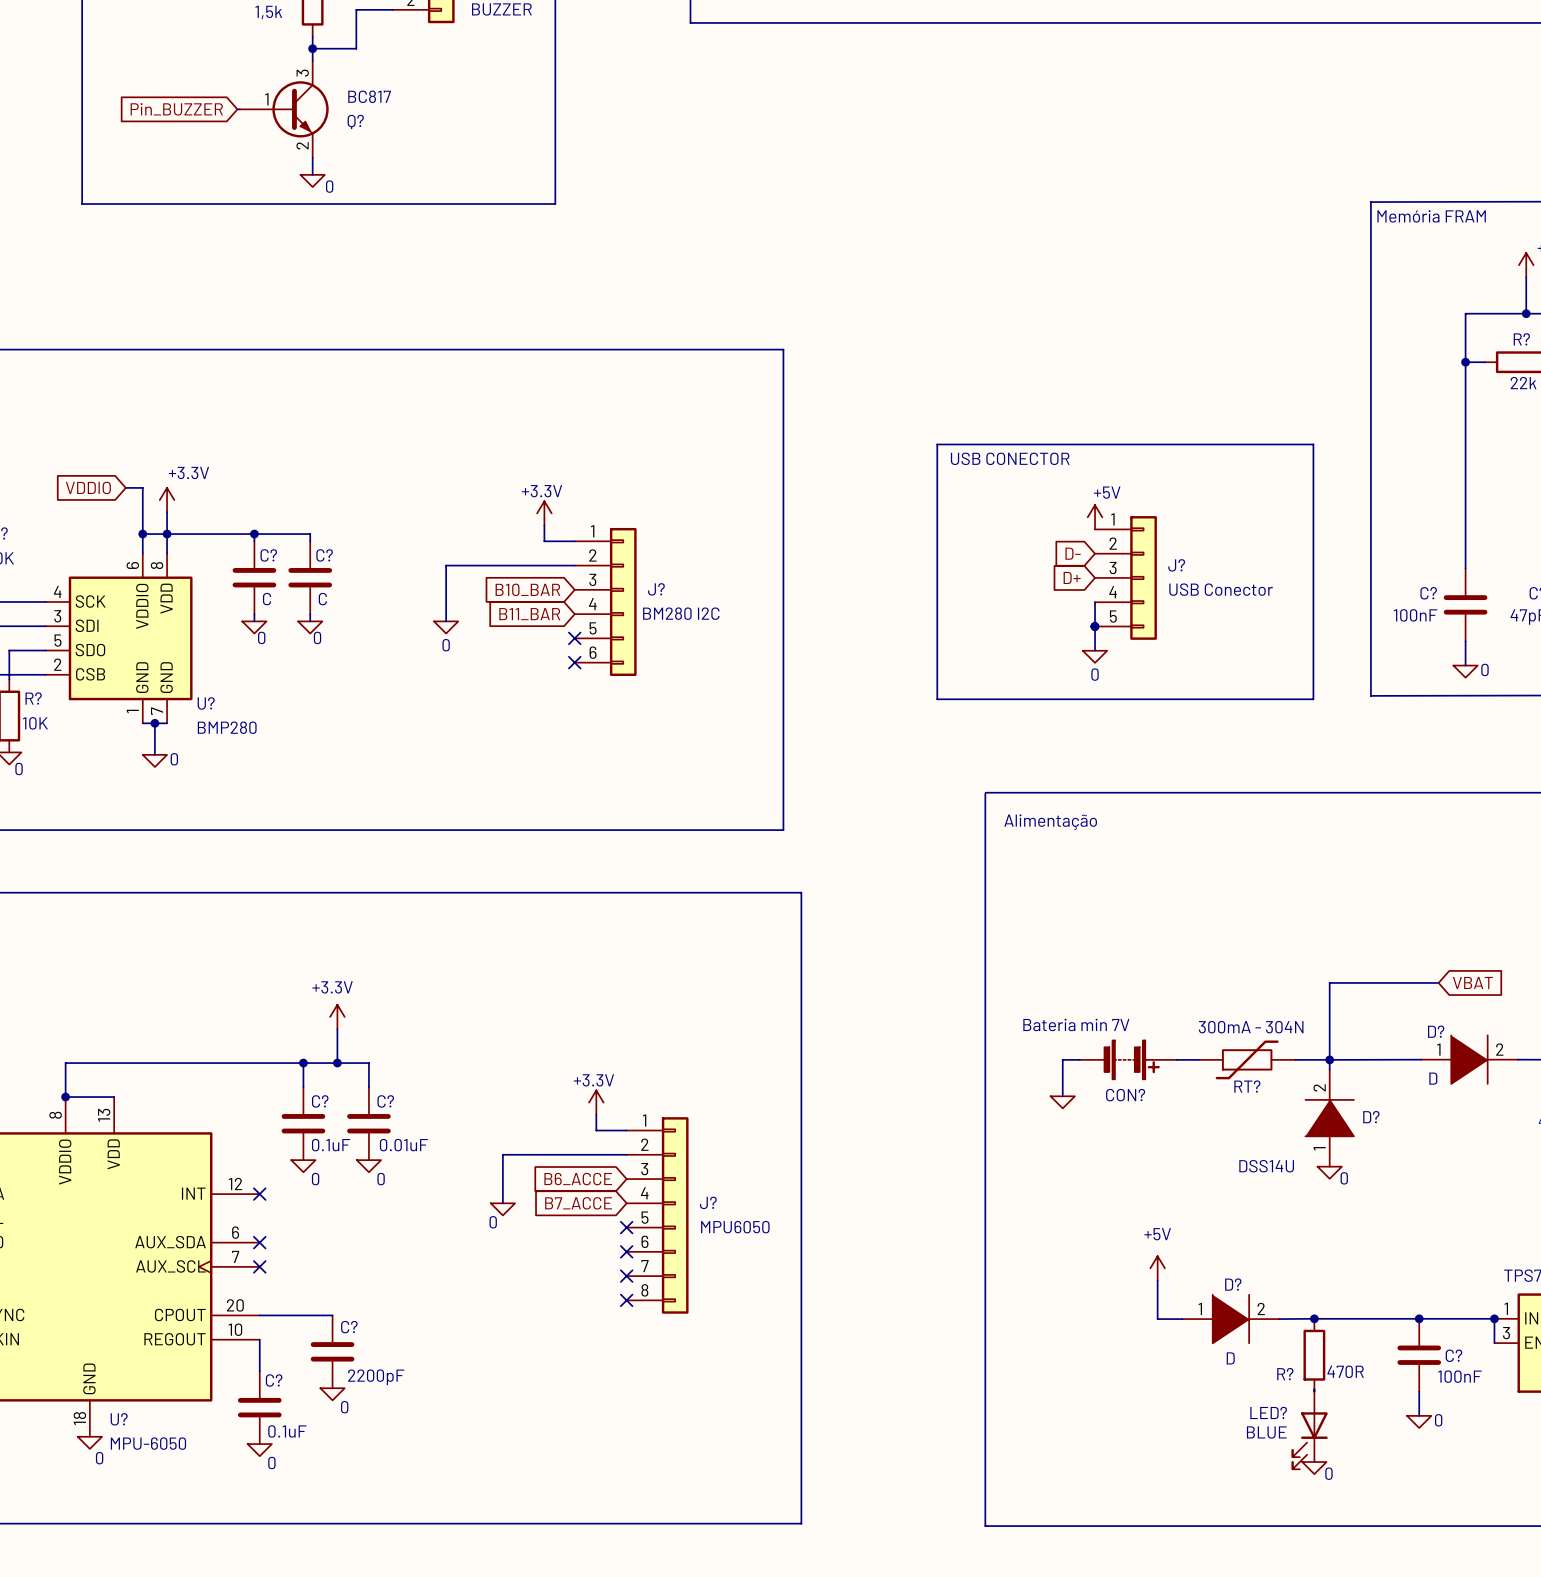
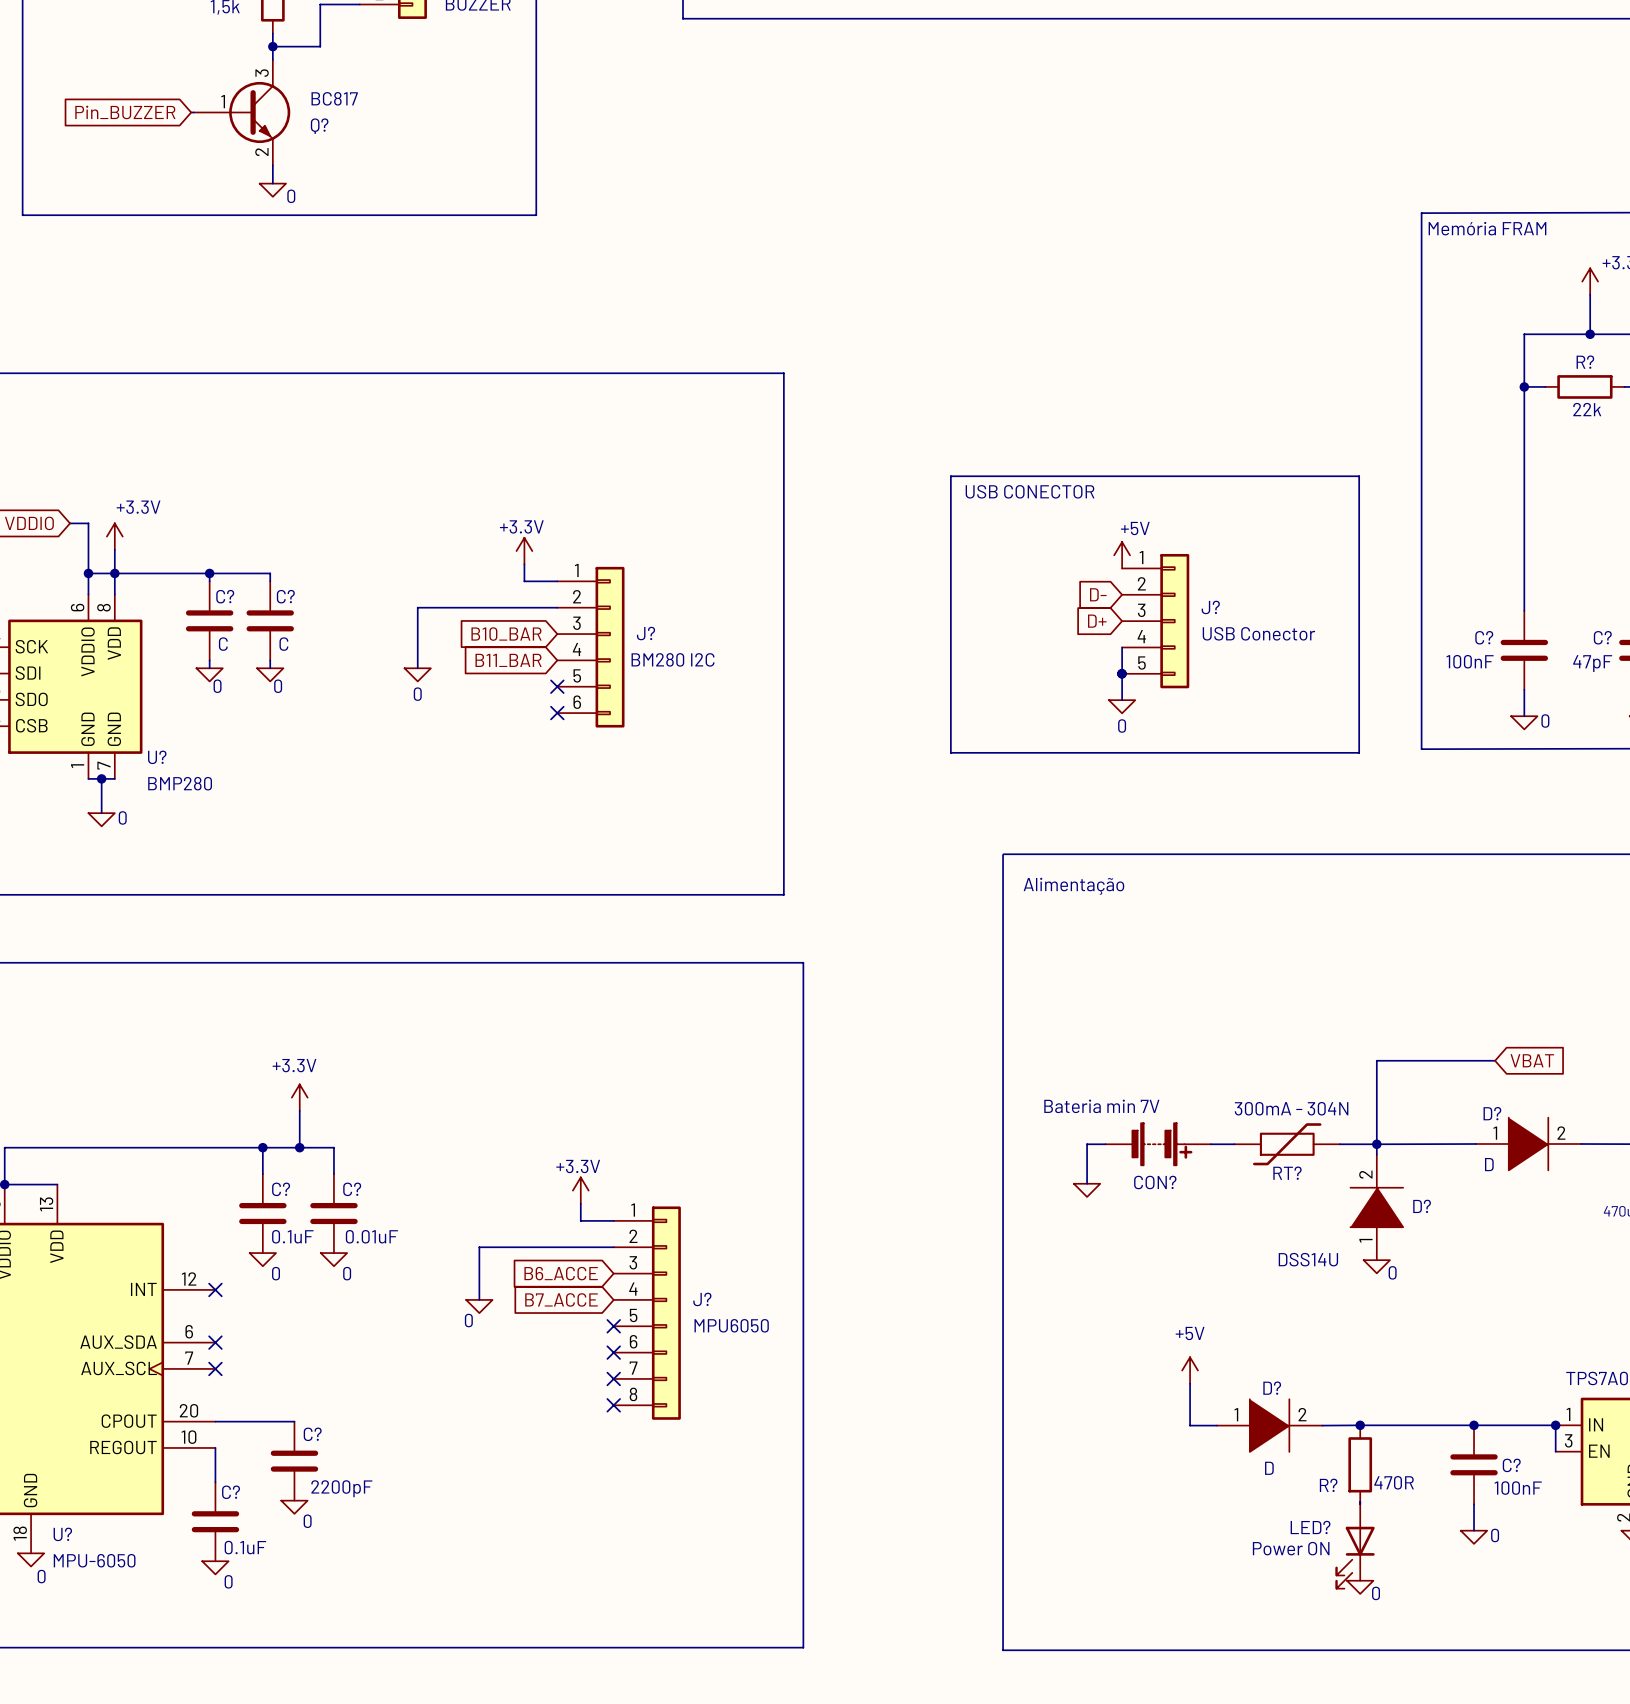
LED? value: BLUE (1266, 1432) -> Power ON (1291, 1548)

